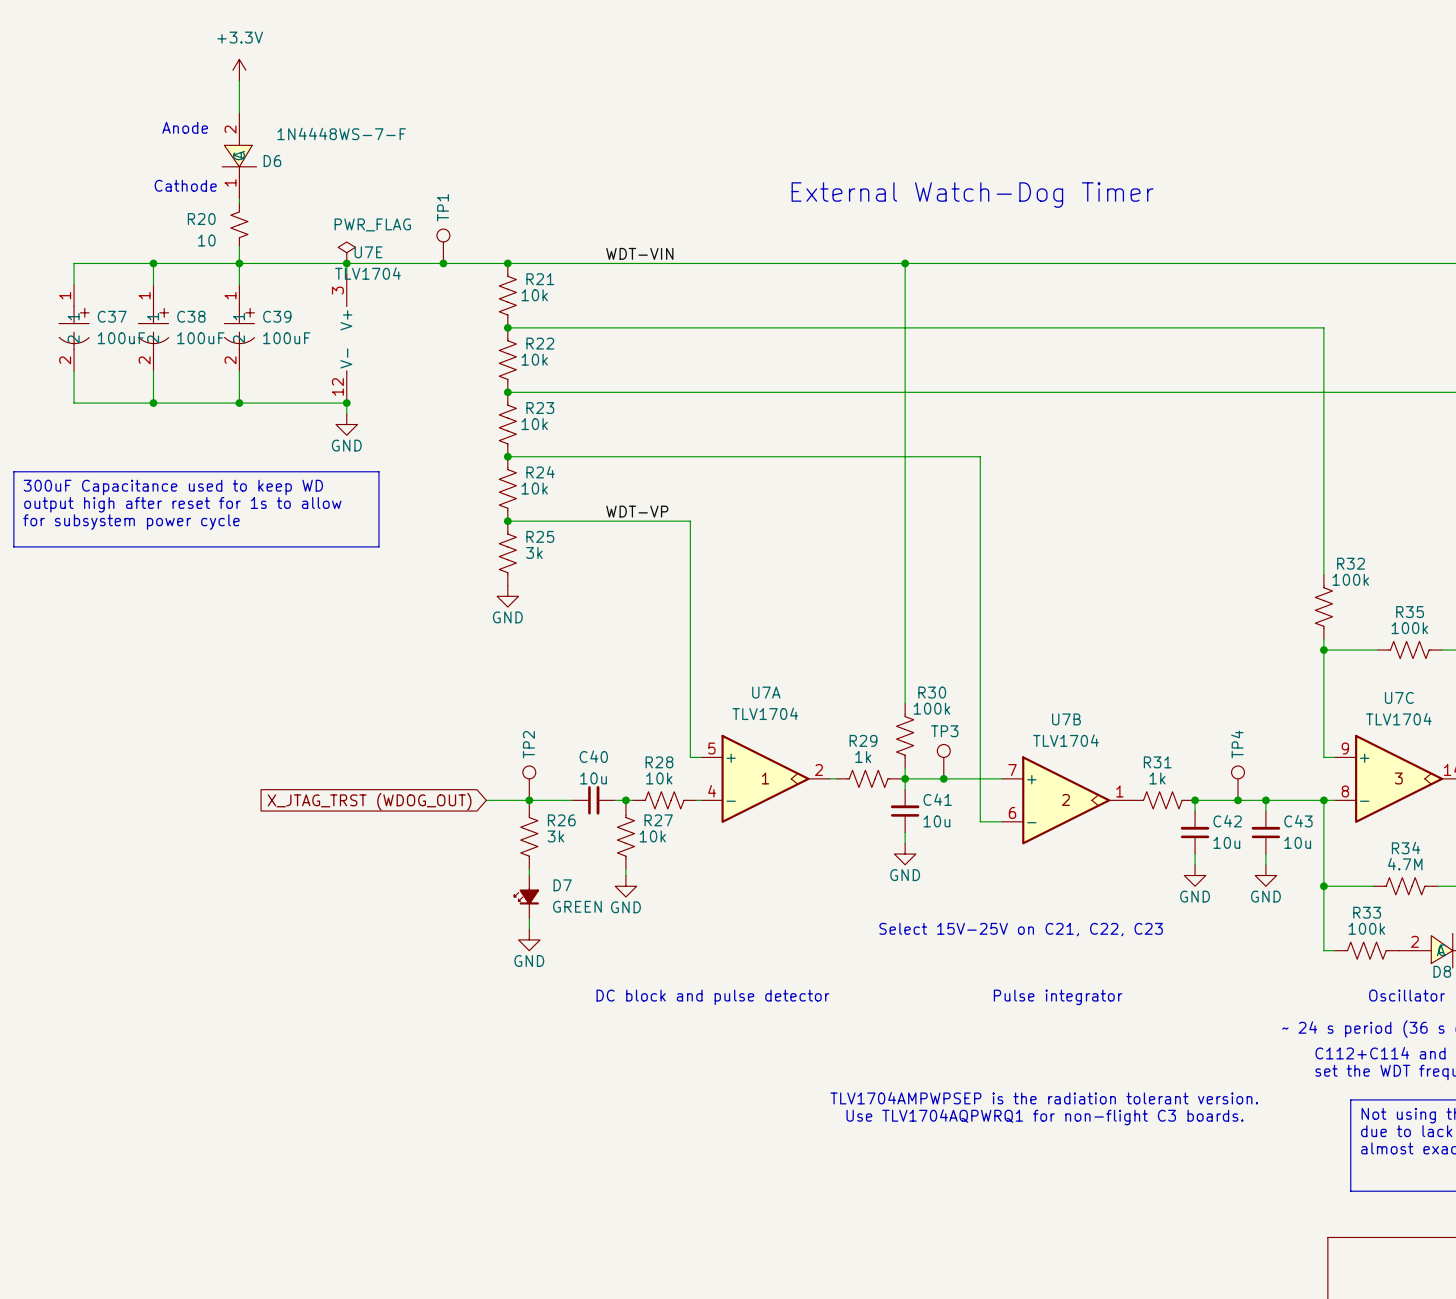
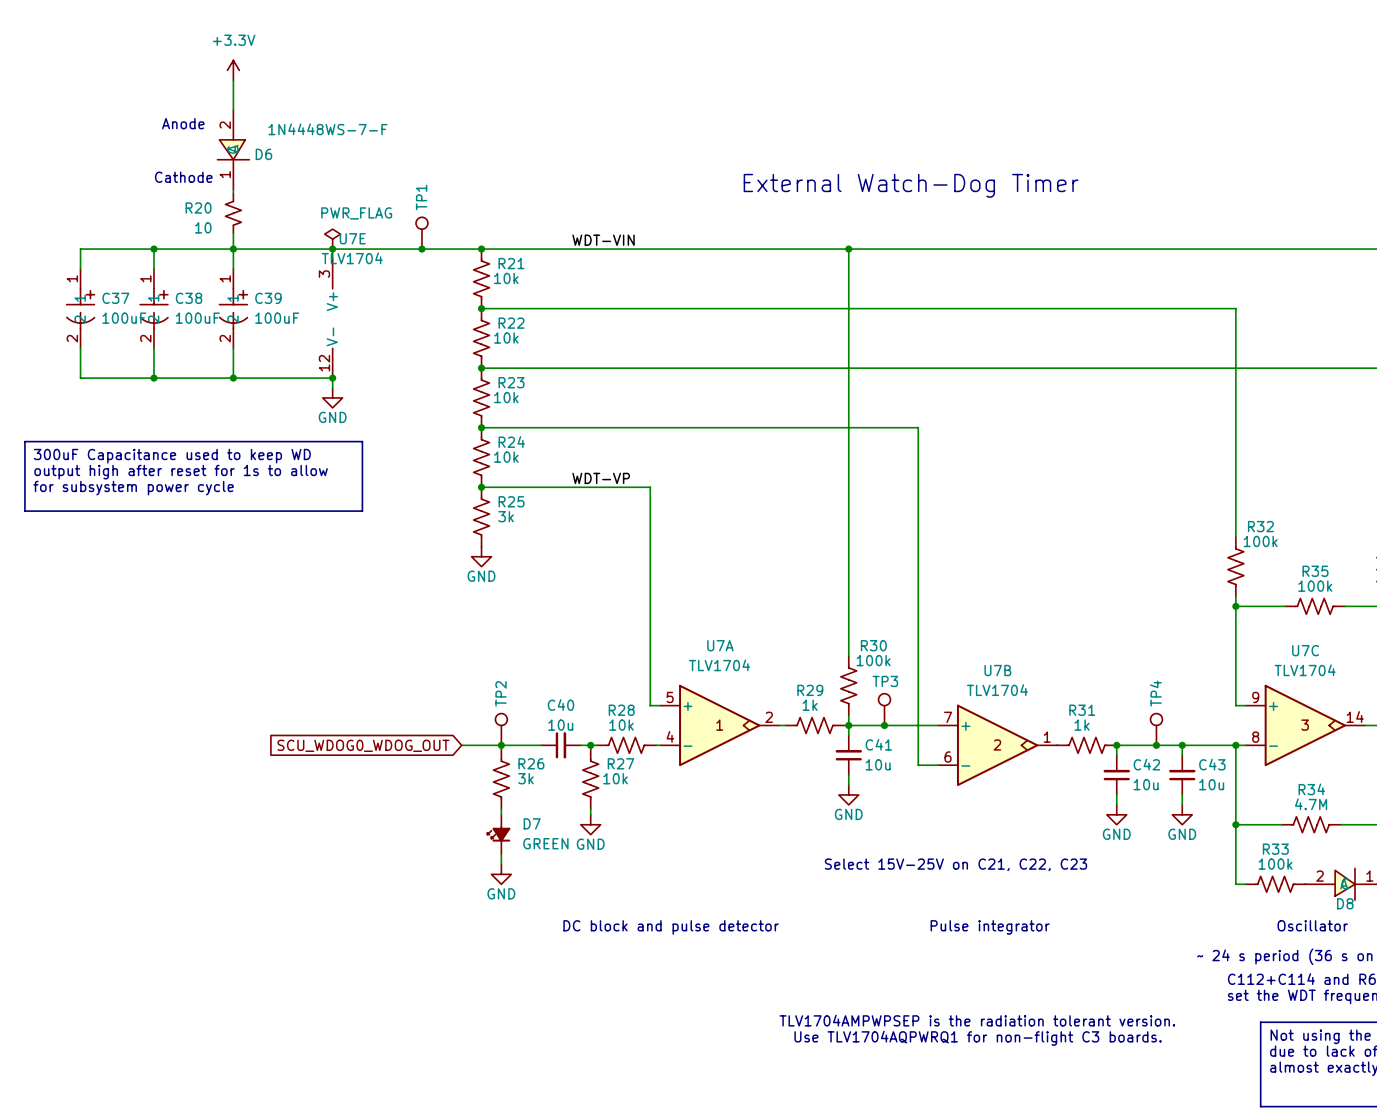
global label: X_JTAG_TRST (WDOG_OUT) (369, 801) -> SCU_WDOG0_WDOG_OUT (363, 745)

